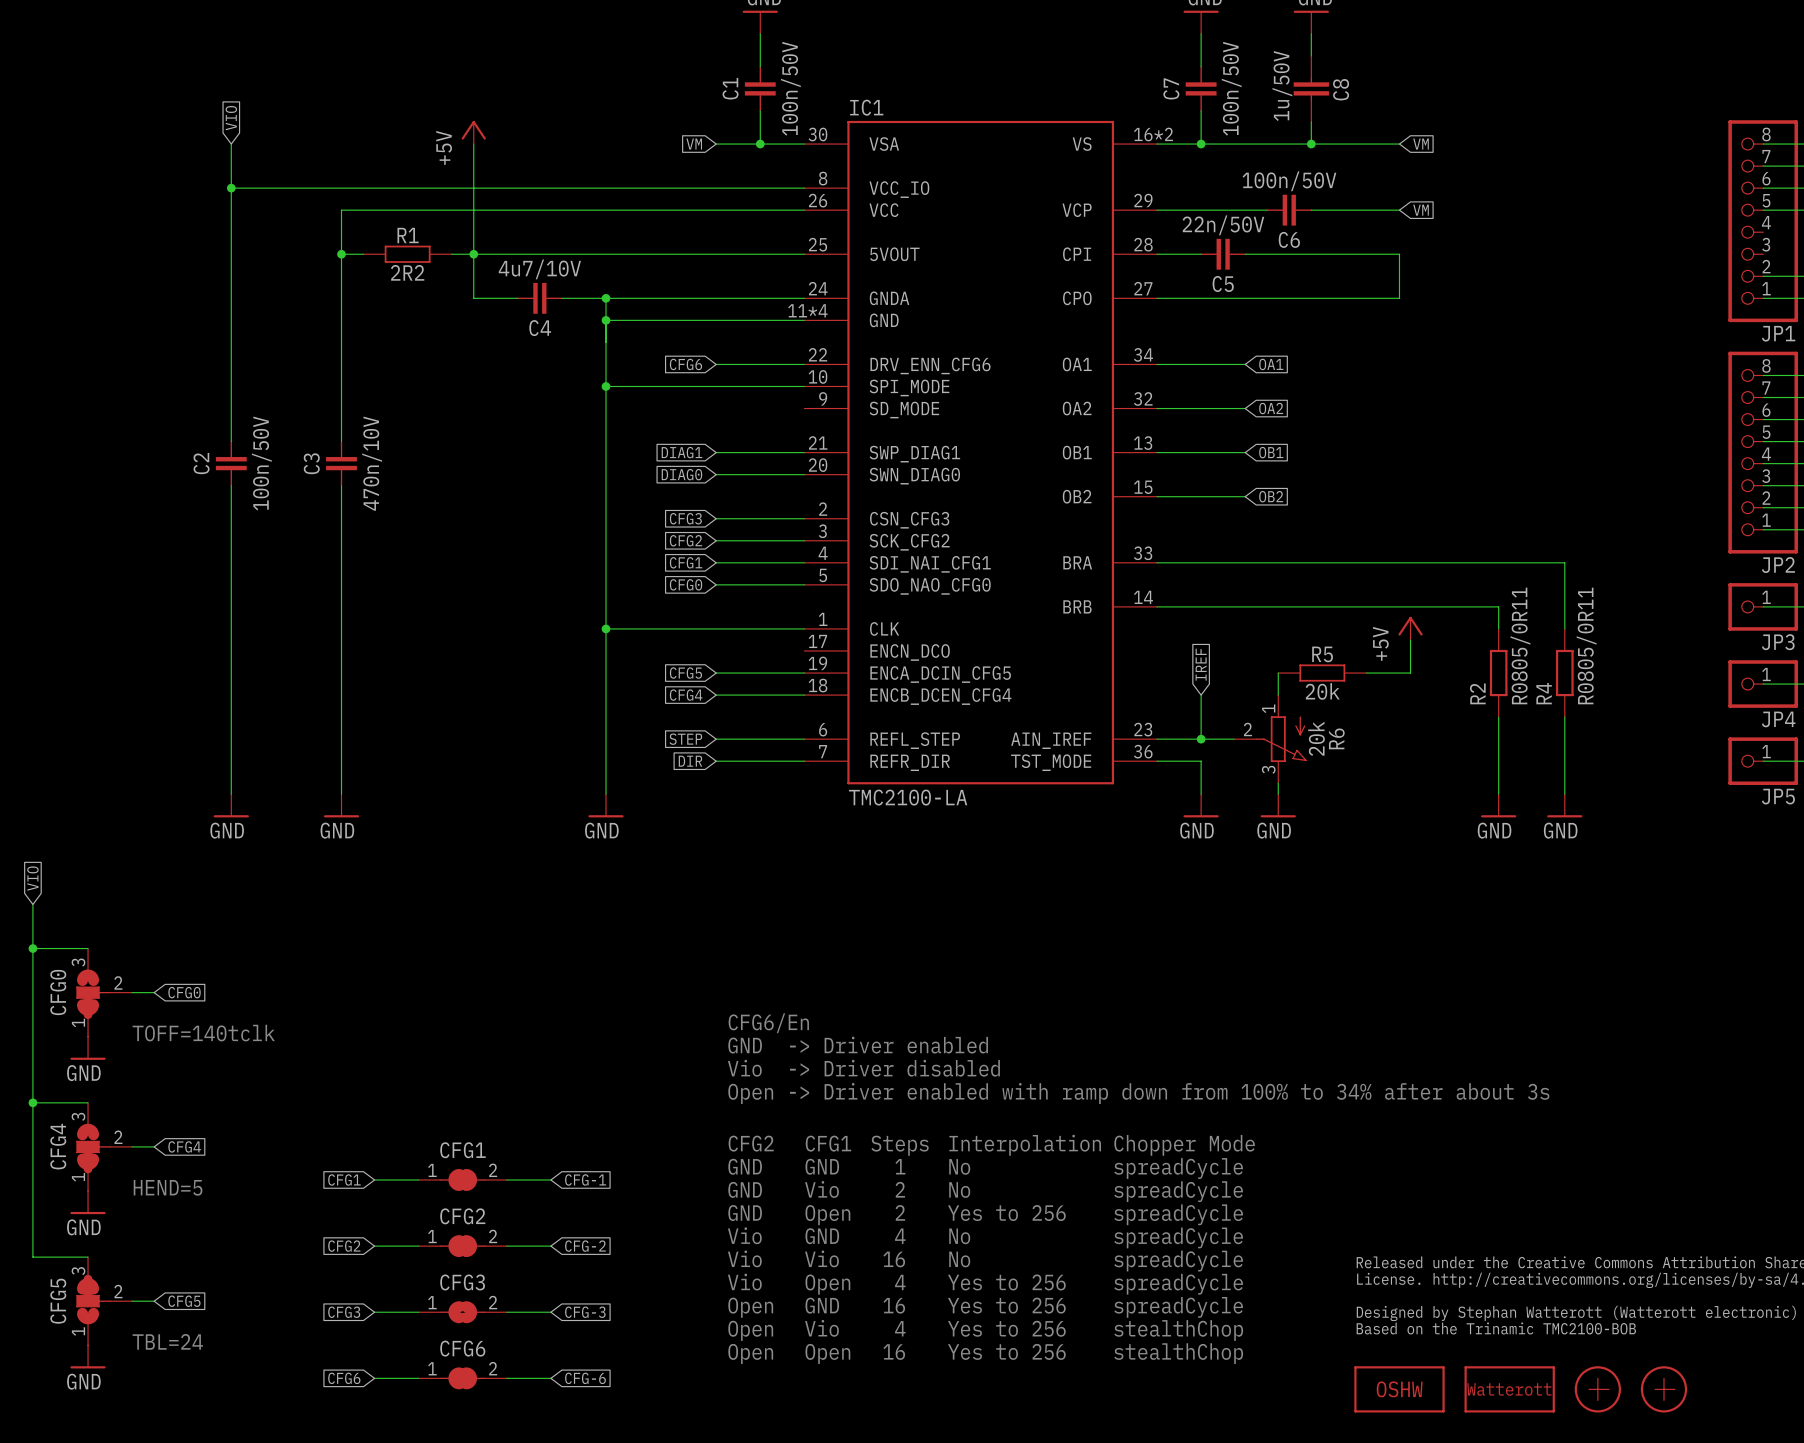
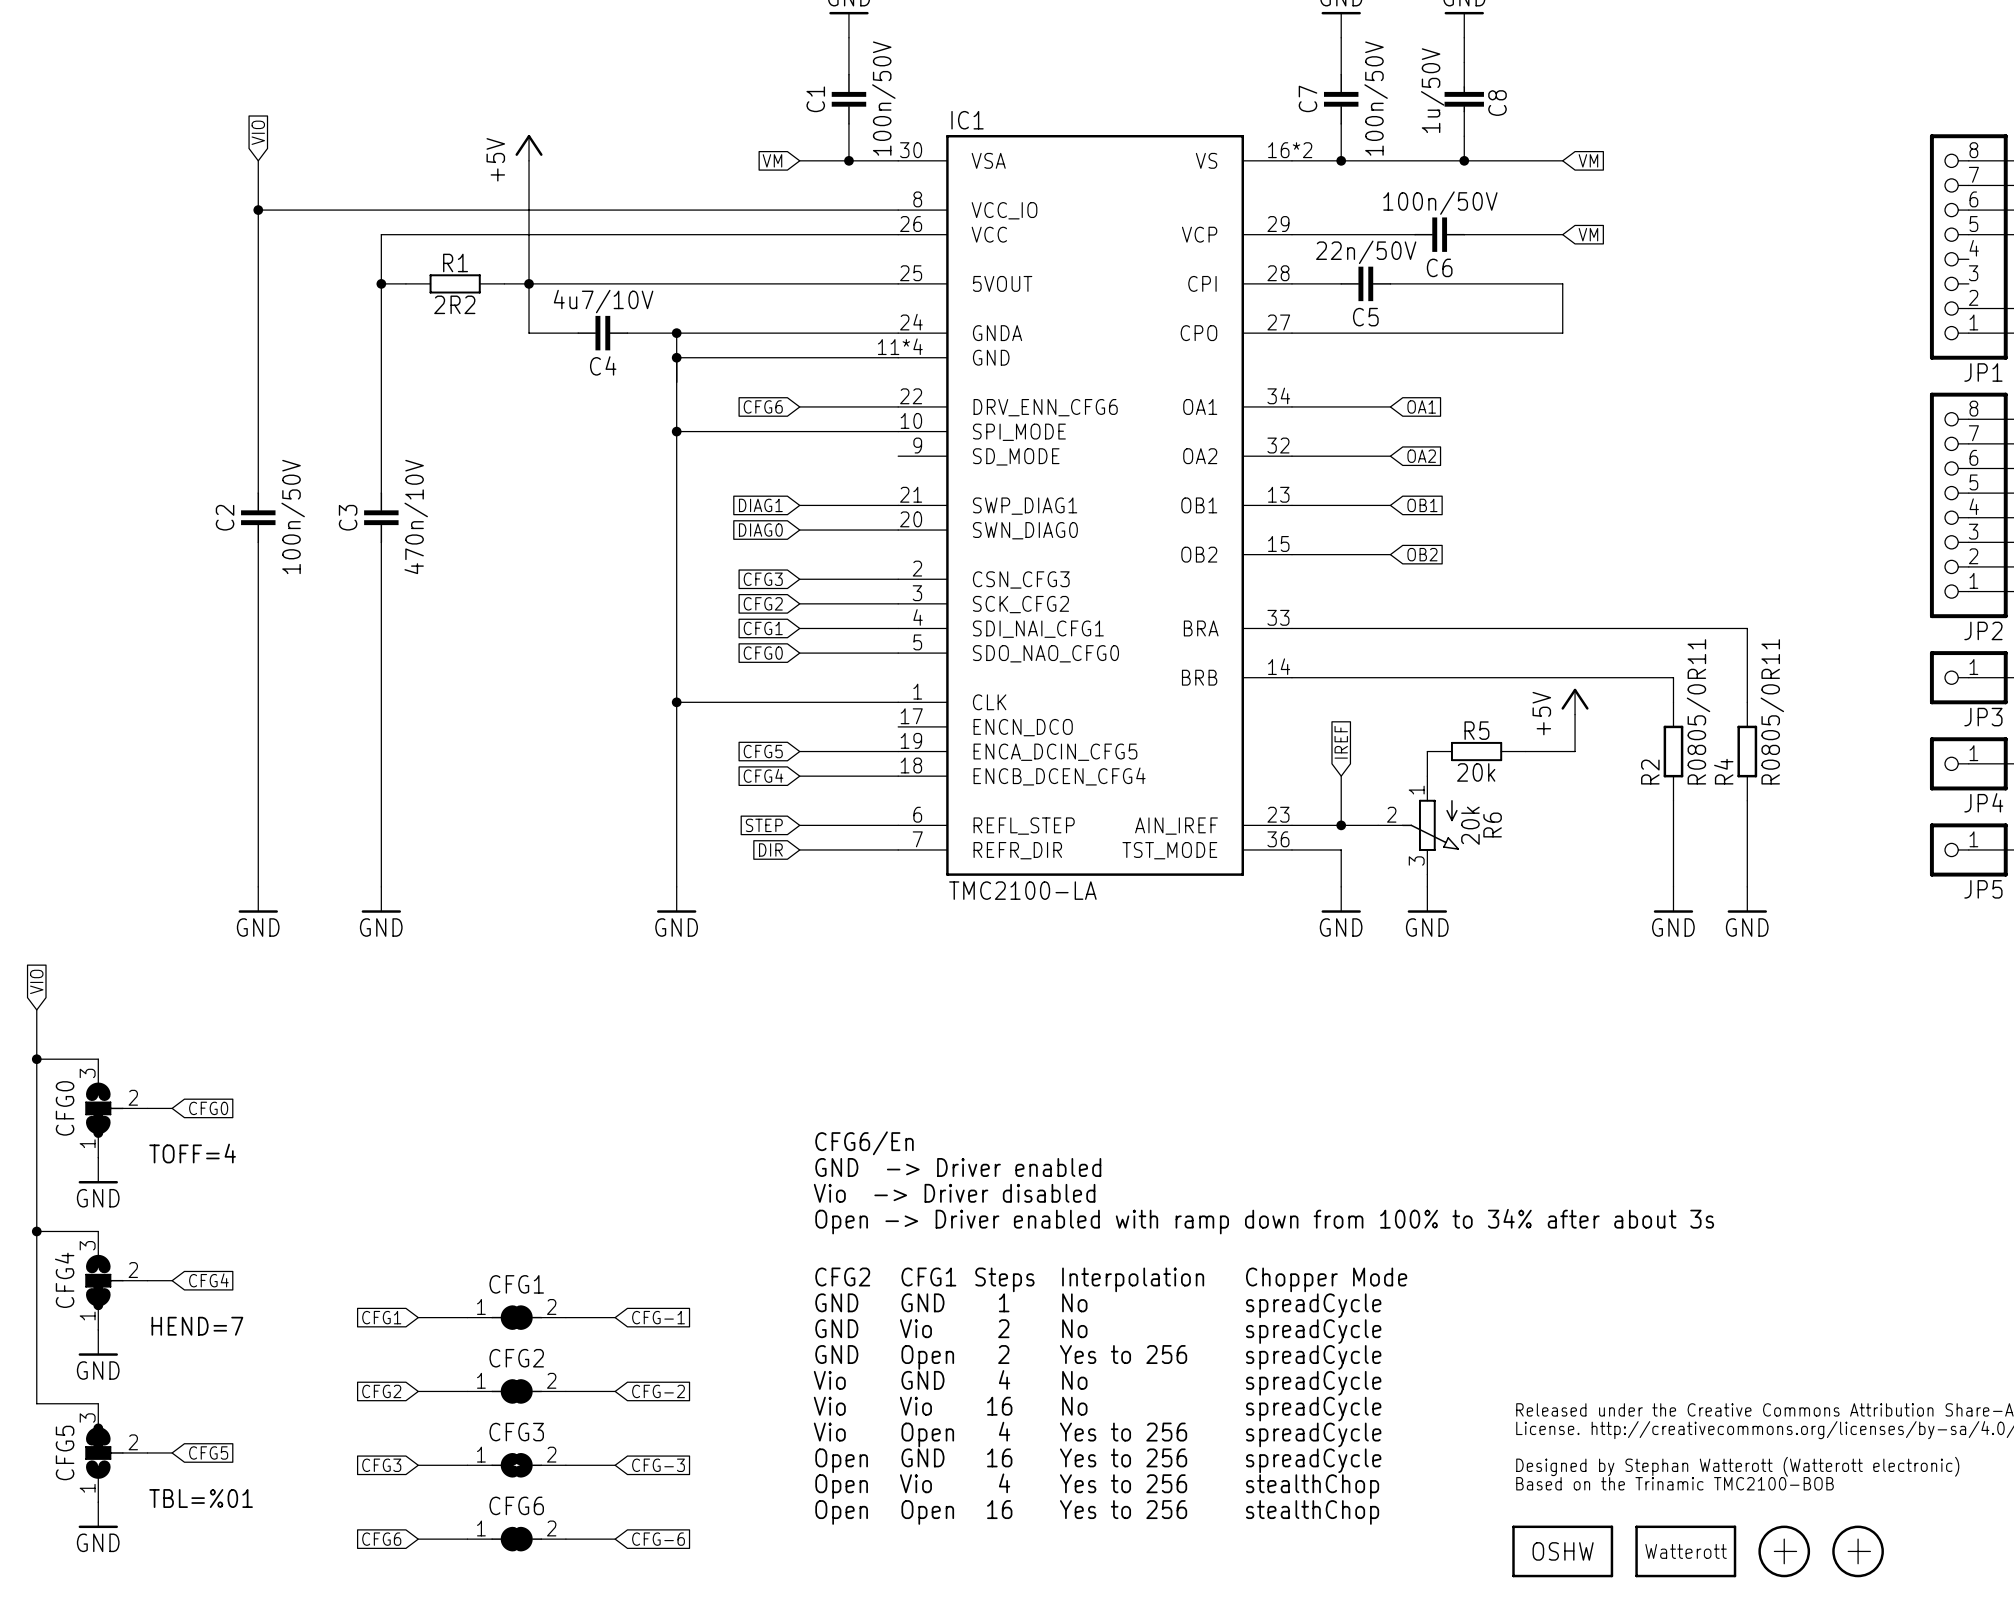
text: TOFF=140tclk (203, 1033) -> TOFF=4 (192, 1153)
text: HEND=5 (168, 1187) -> HEND=7 (197, 1326)
text: TBL=24 (167, 1341) -> TBL=%01 (201, 1498)

